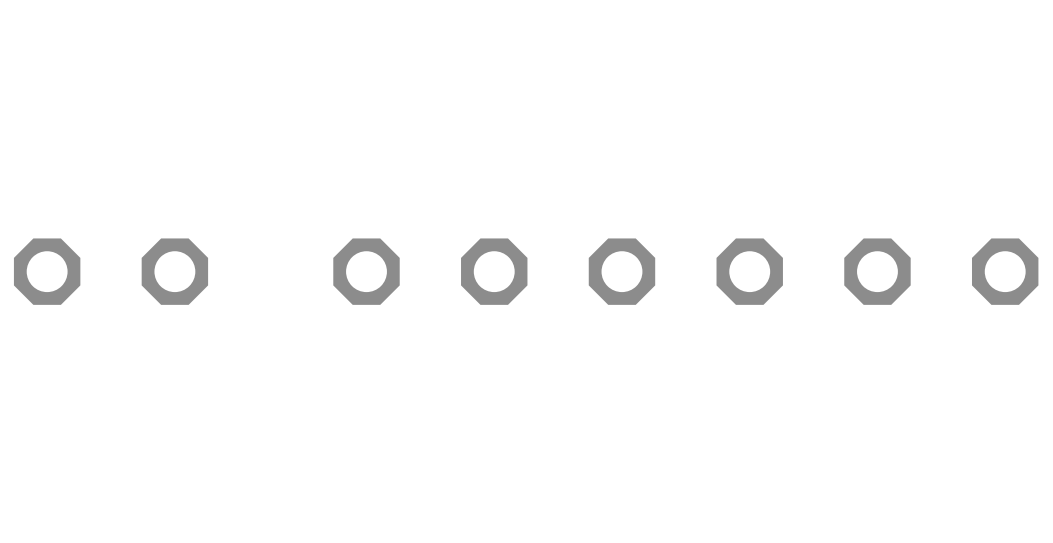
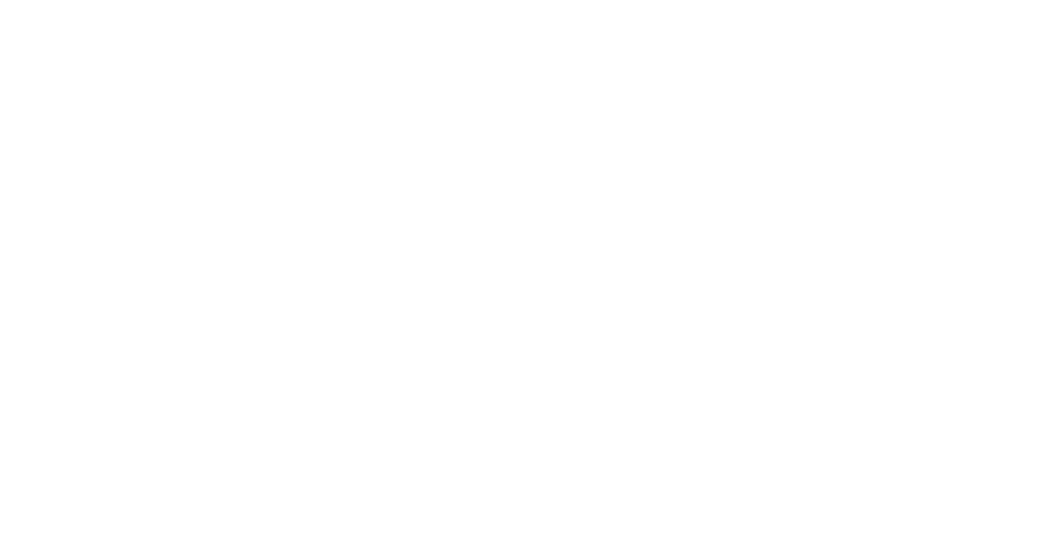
part: (111, 271) -> none
part: (430, 271) -> none
part: (685, 271) -> none
part: (941, 271) -> none

